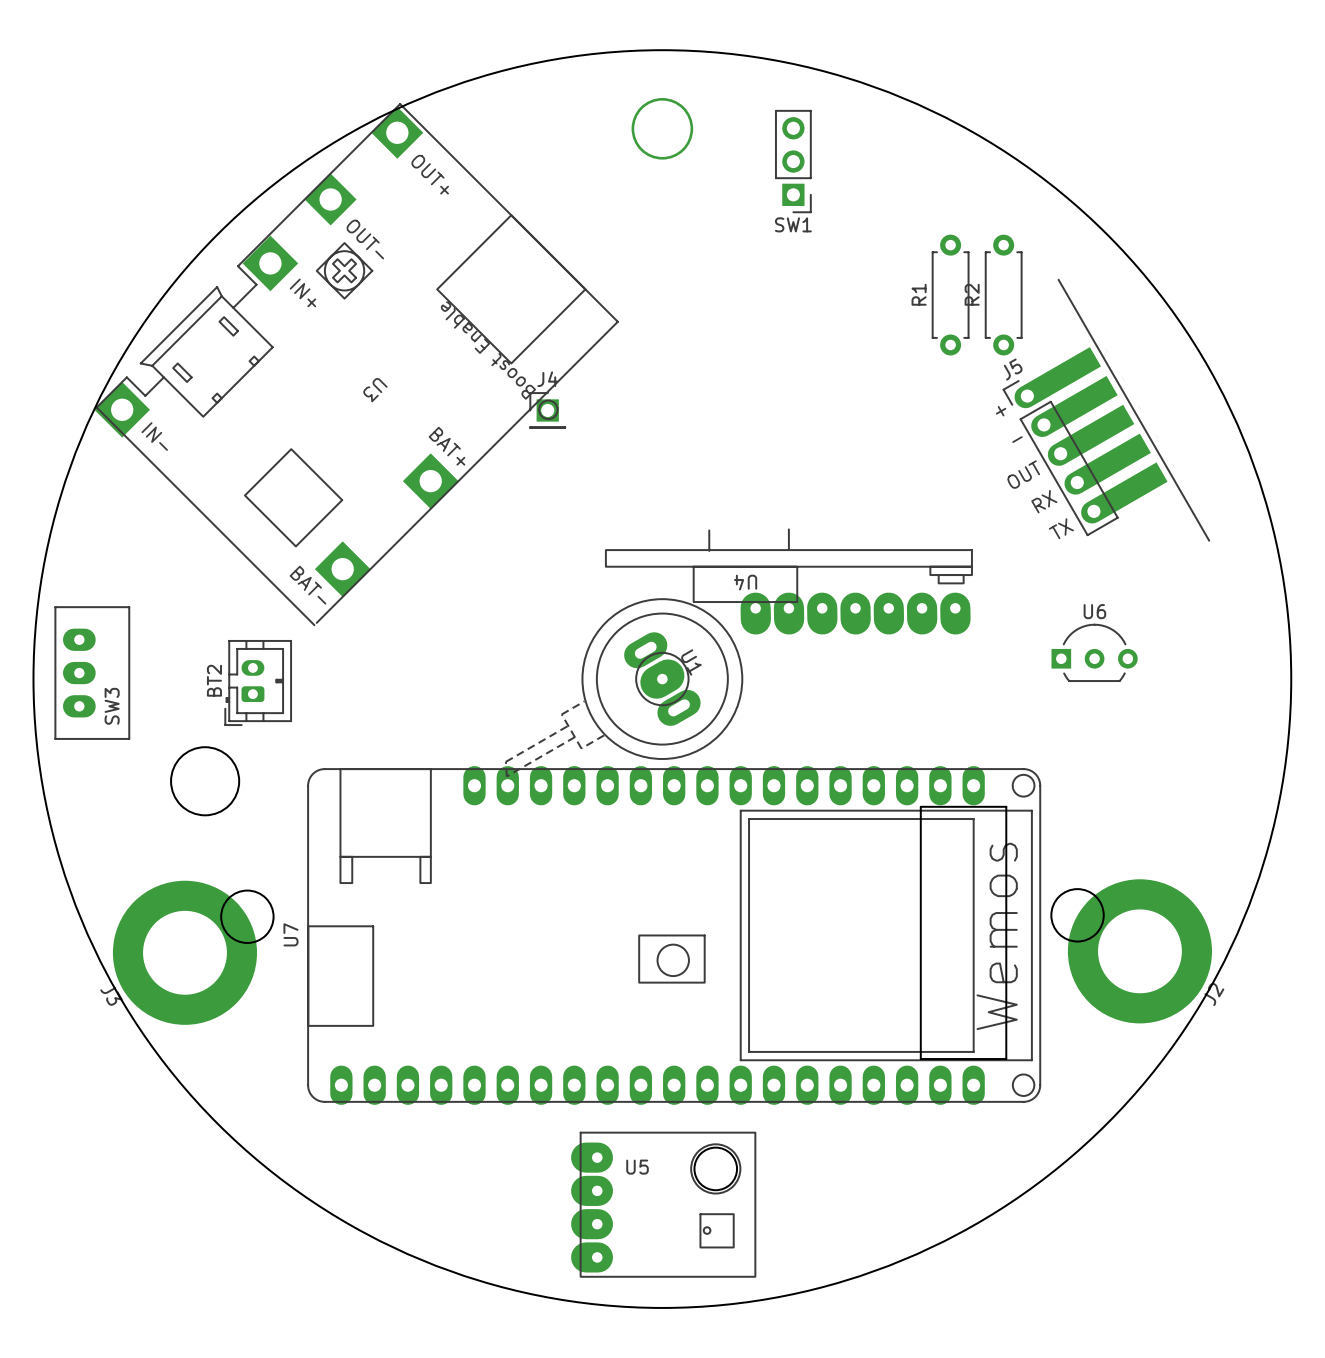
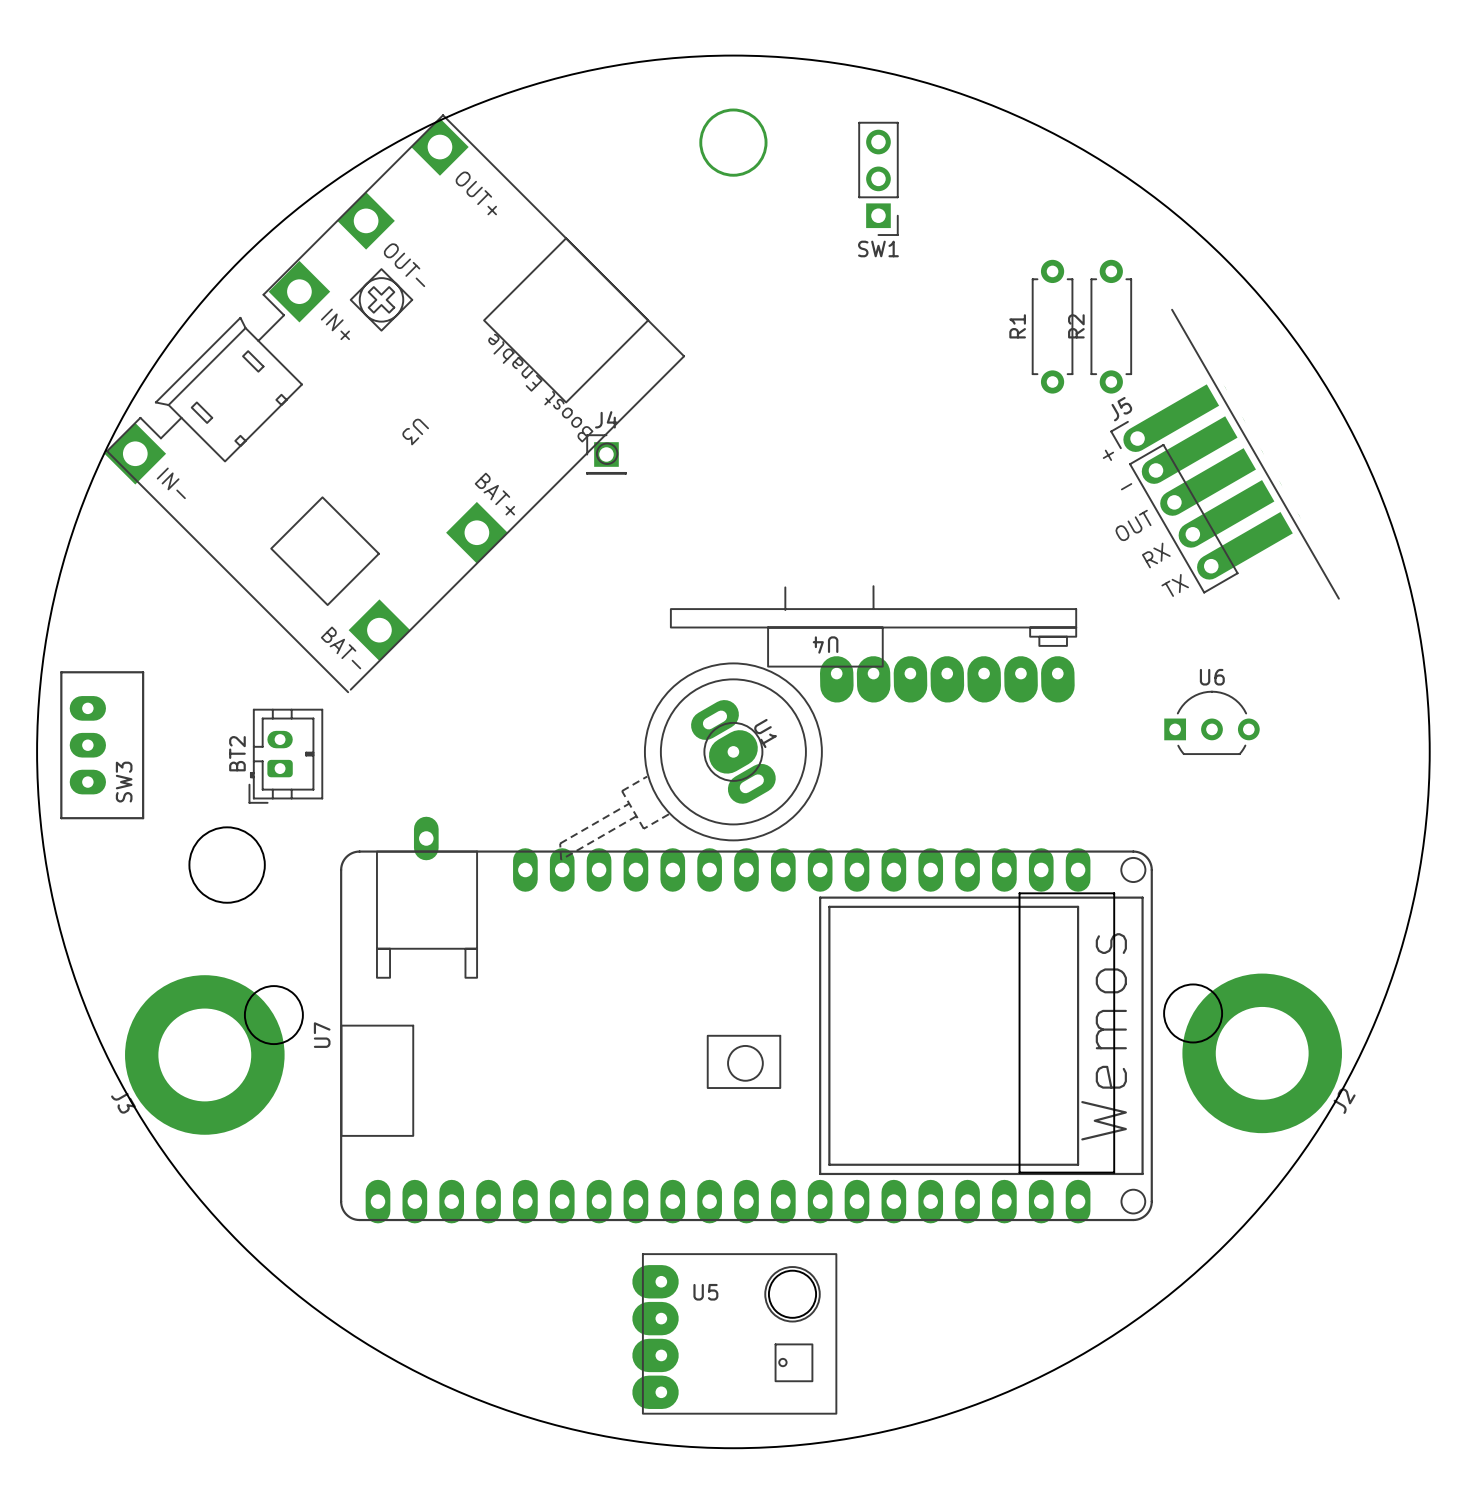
U7 footprint: [307, 766, 1042, 1105] -> [340, 816, 1153, 1224]

